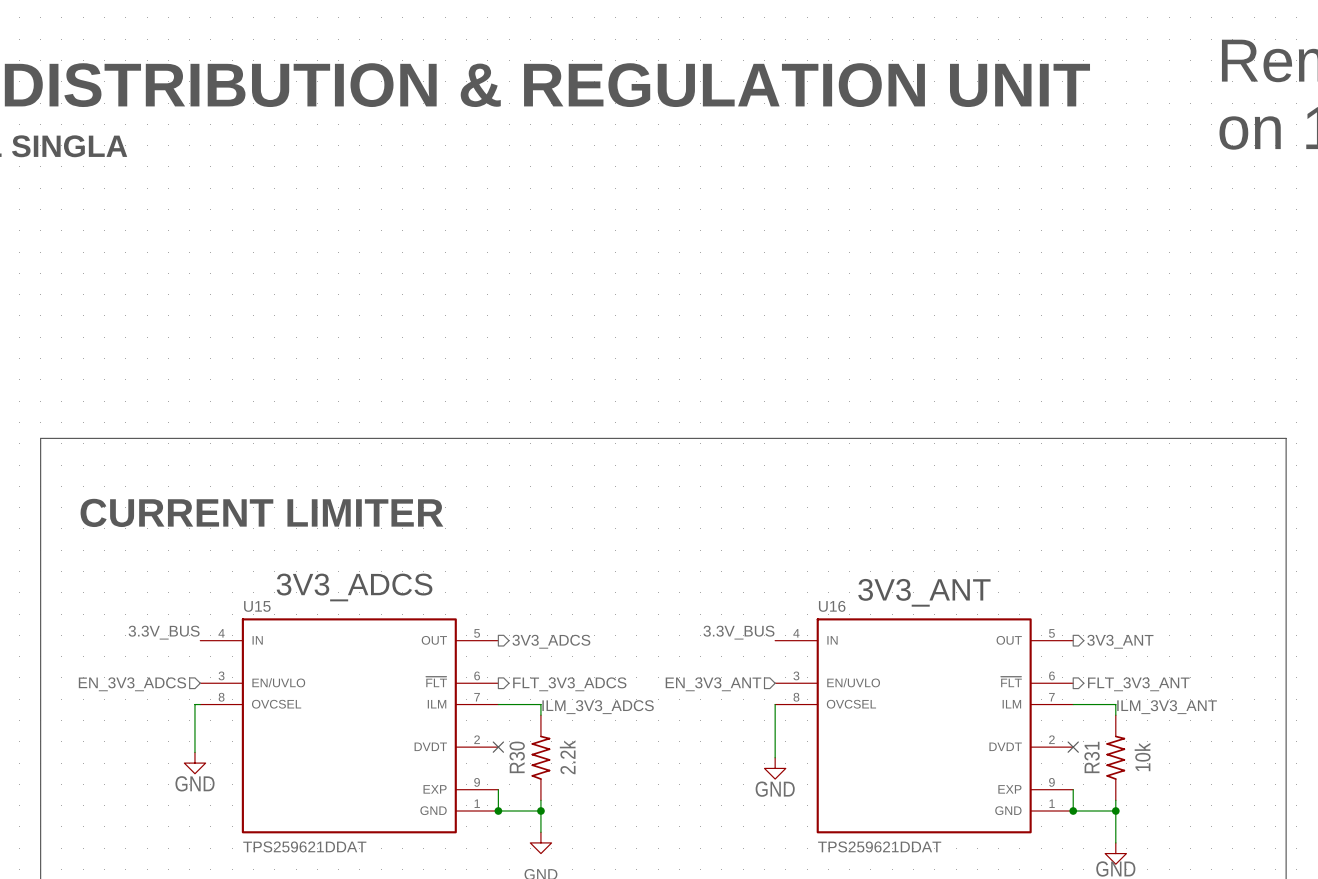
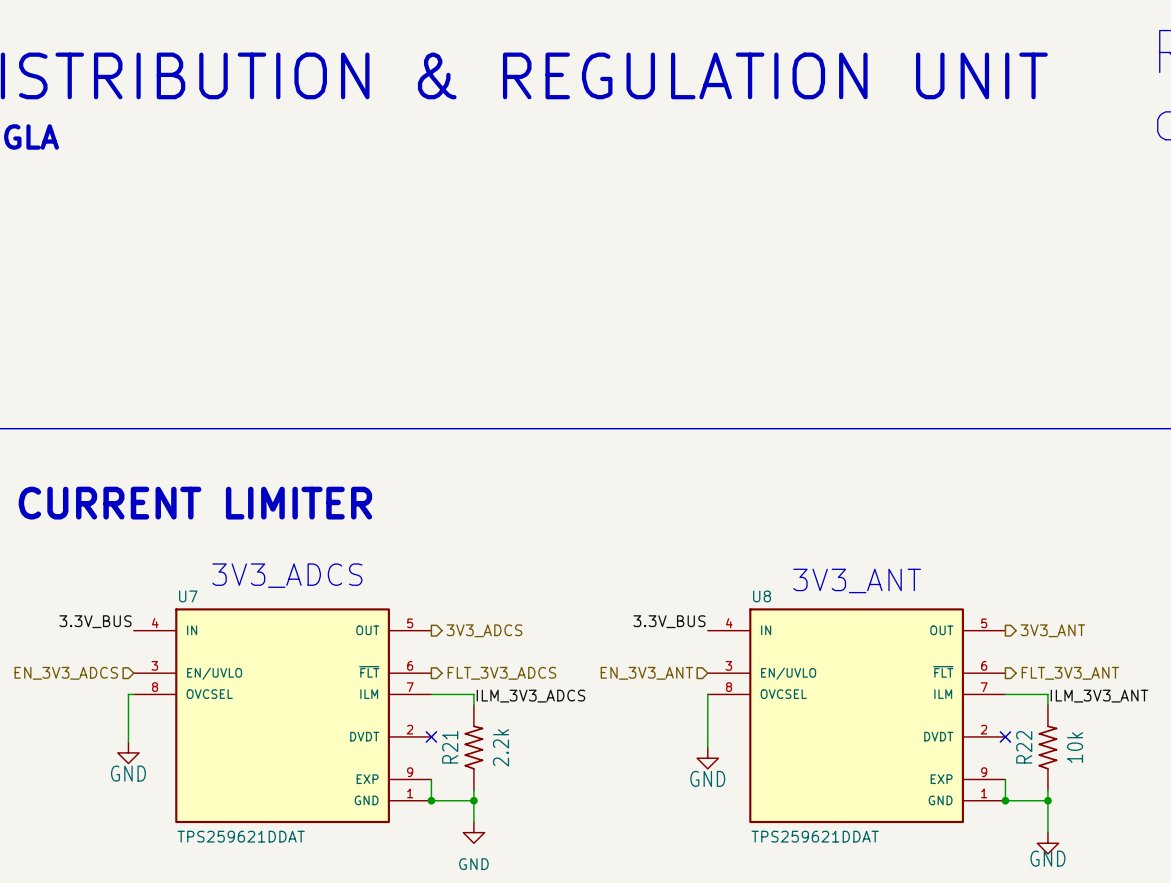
U15 name: U15 (257, 606) -> U7 (188, 596)
U16 name: U16 (832, 606) -> U8 (762, 596)
R30 name: R30 (517, 757) -> R21 (450, 747)
R31 name: R31 (1092, 757) -> R22 (1024, 747)

